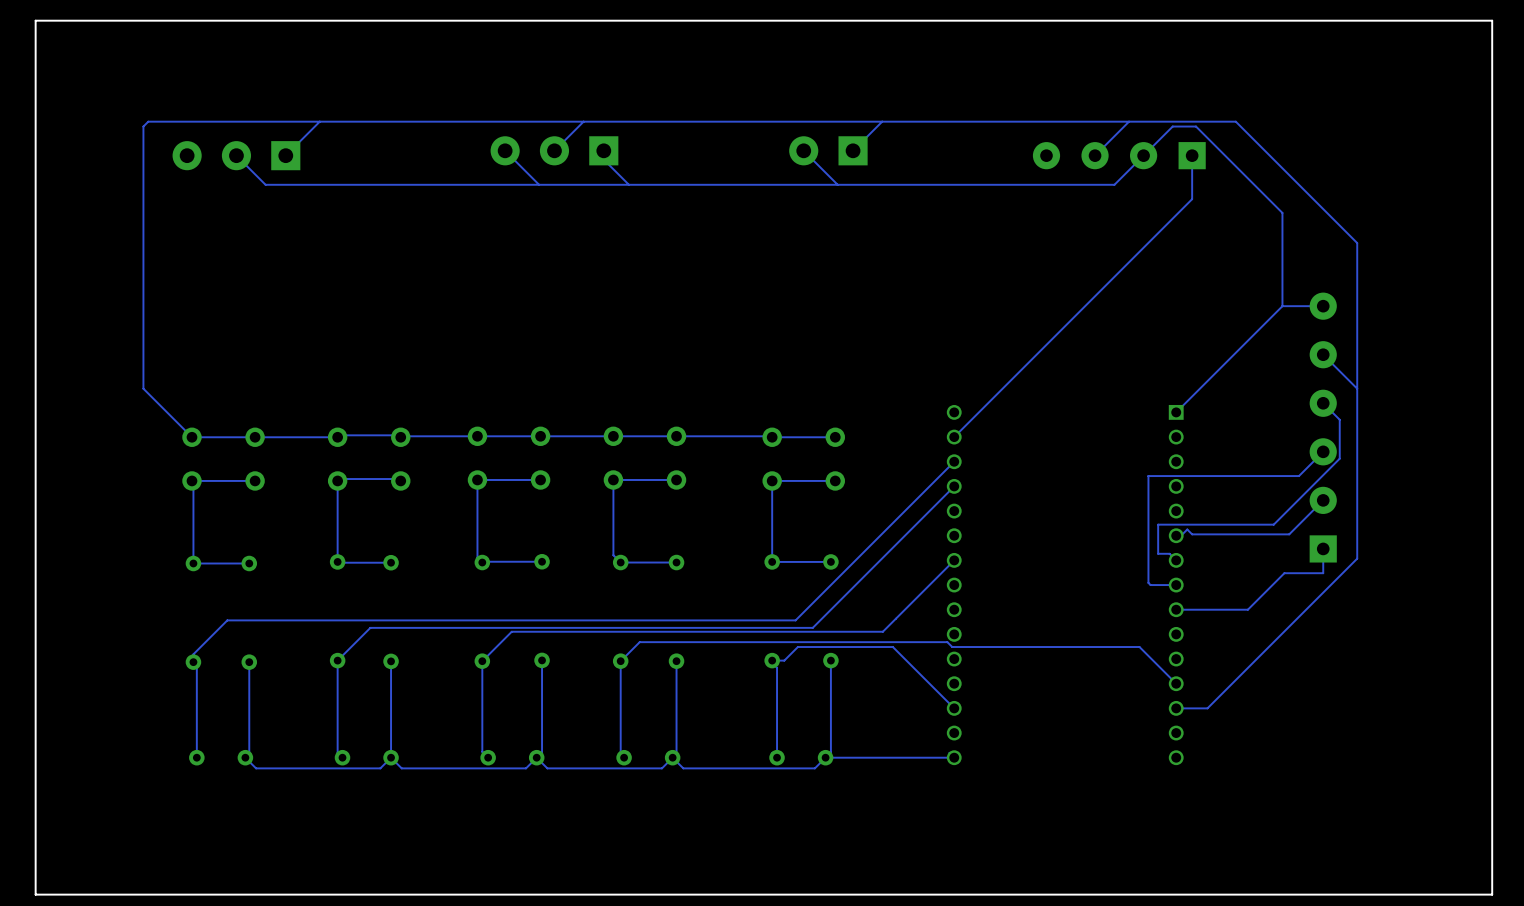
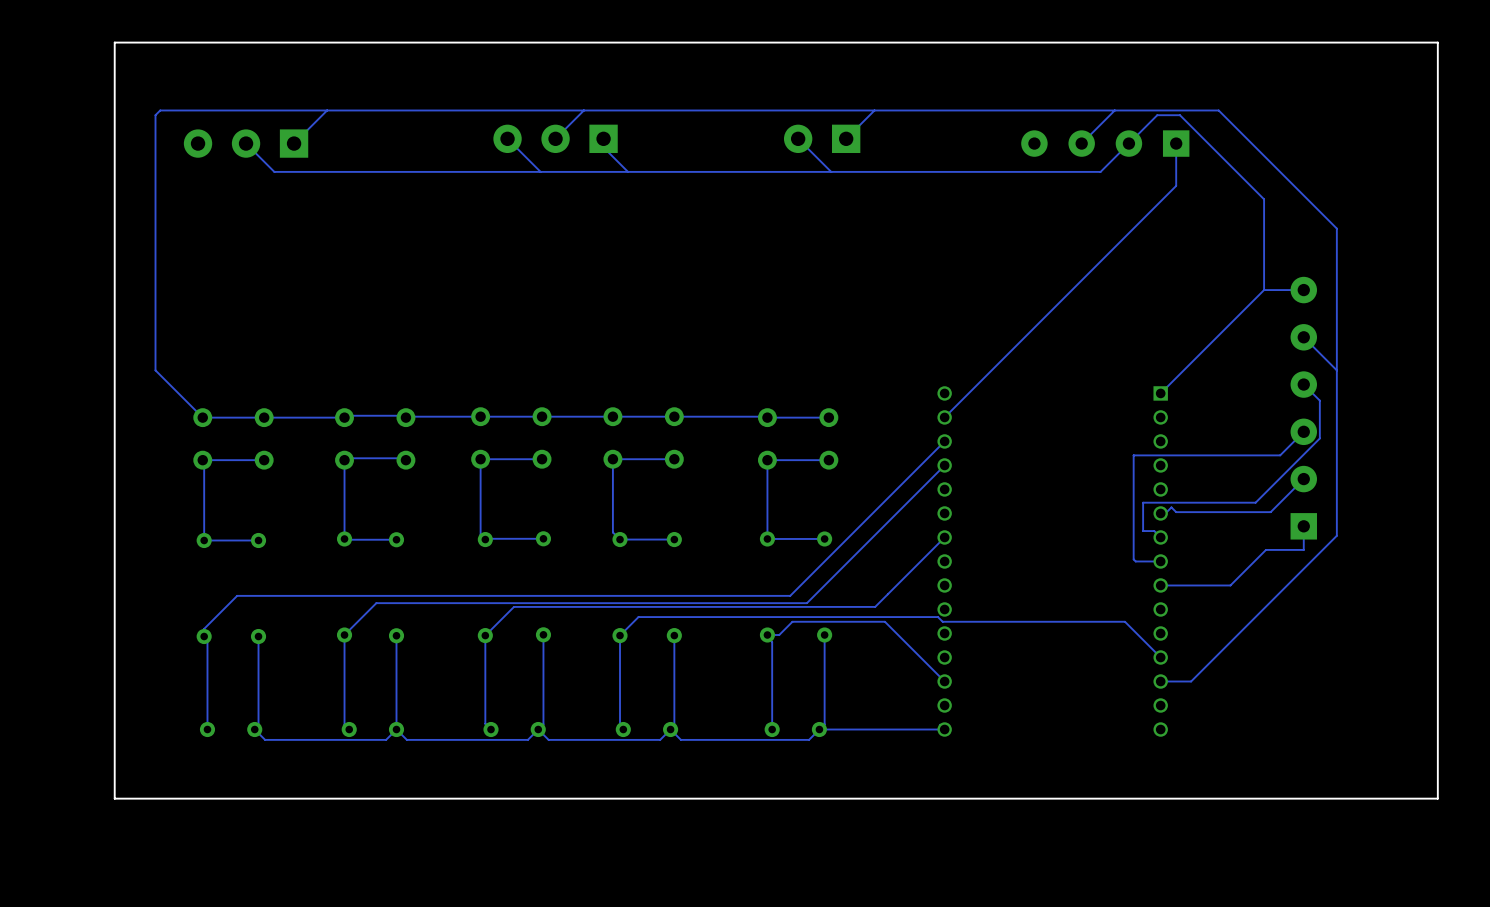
board edge: (1492, 20) (35, 20) (35, 894) (1492, 894) (1492, 20) -> (1437, 42) (1437, 798) (114, 798) (114, 42) (1437, 42)

